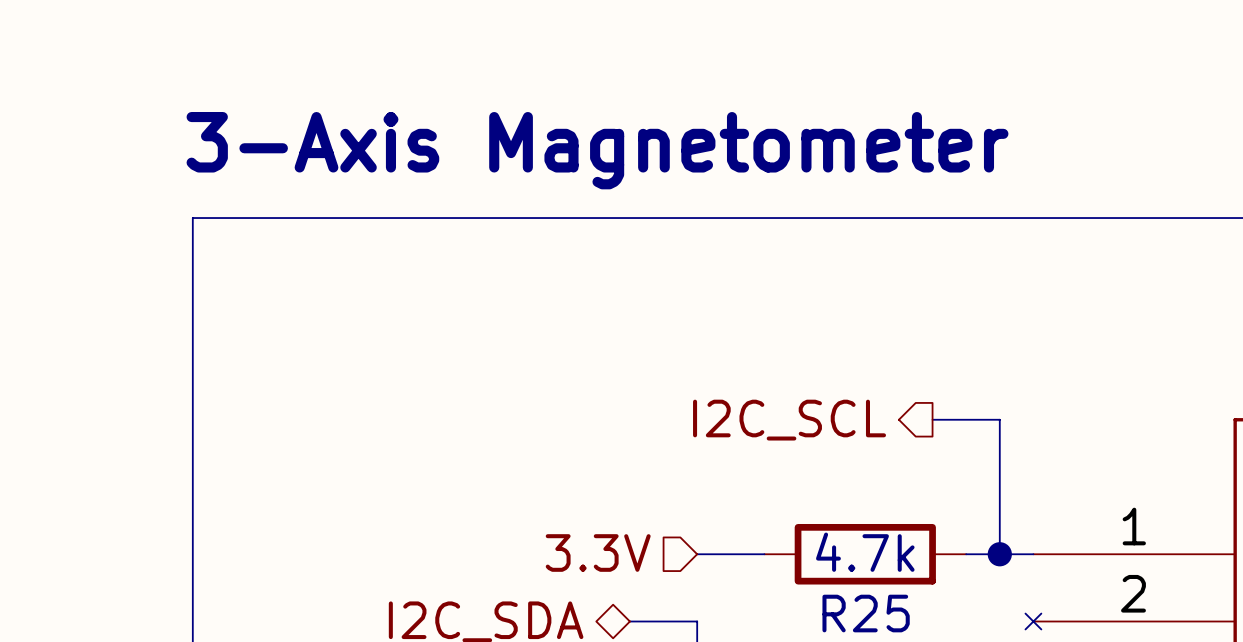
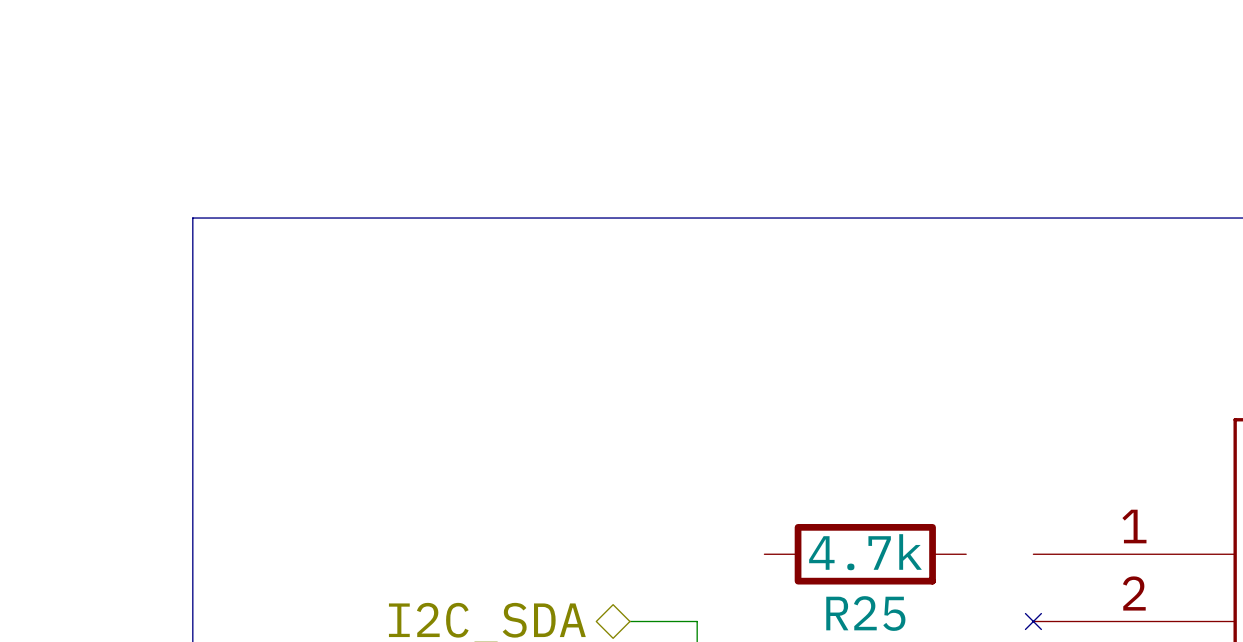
text: 3-Axis Magnetometer (597, 150) -> none
wire: (932, 419) (999, 419) (999, 554) -> none
hierarchical label: I2C_SCL (789, 420) -> none
hierarchical label: 3.3V (598, 553) -> none
wire: (697, 554) (764, 554) -> none
wire: (966, 554) (1033, 554) -> none
junction: (999, 554) -> none

